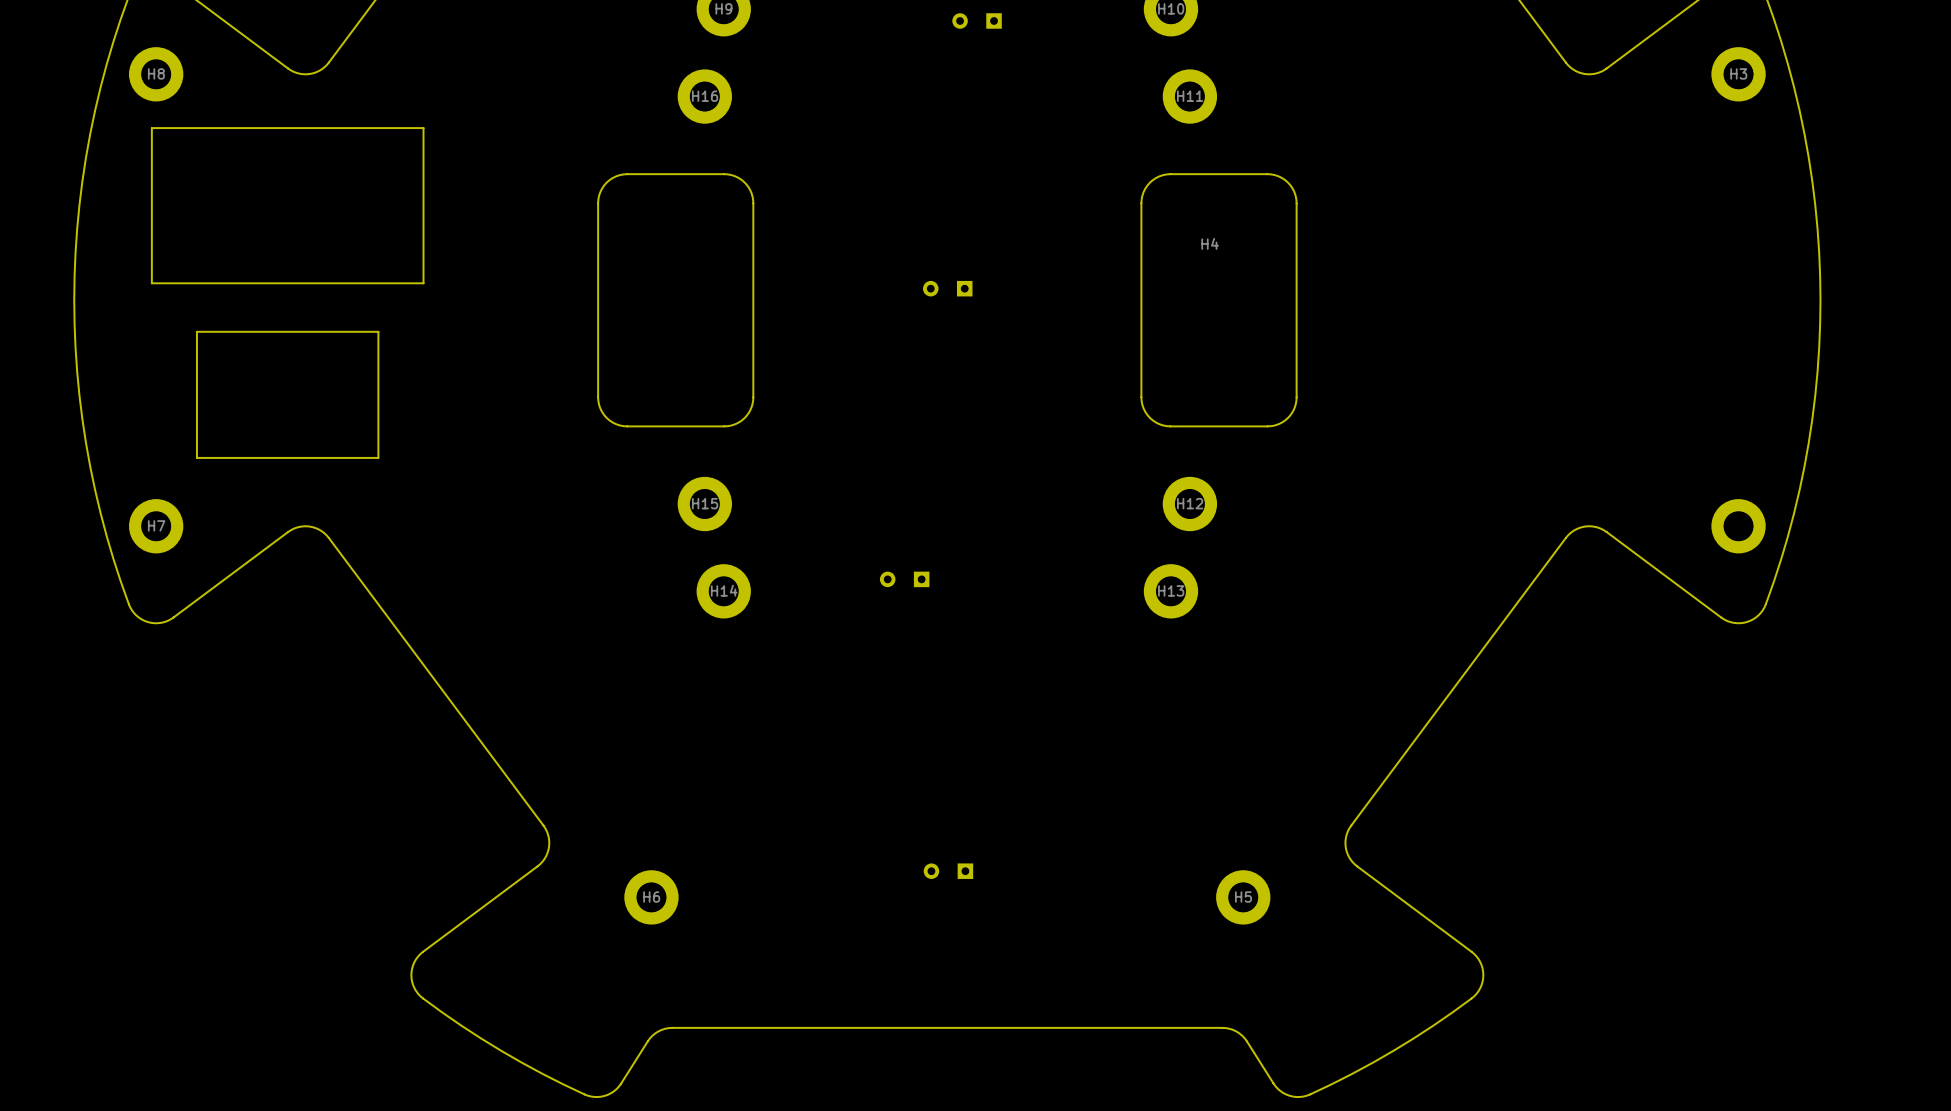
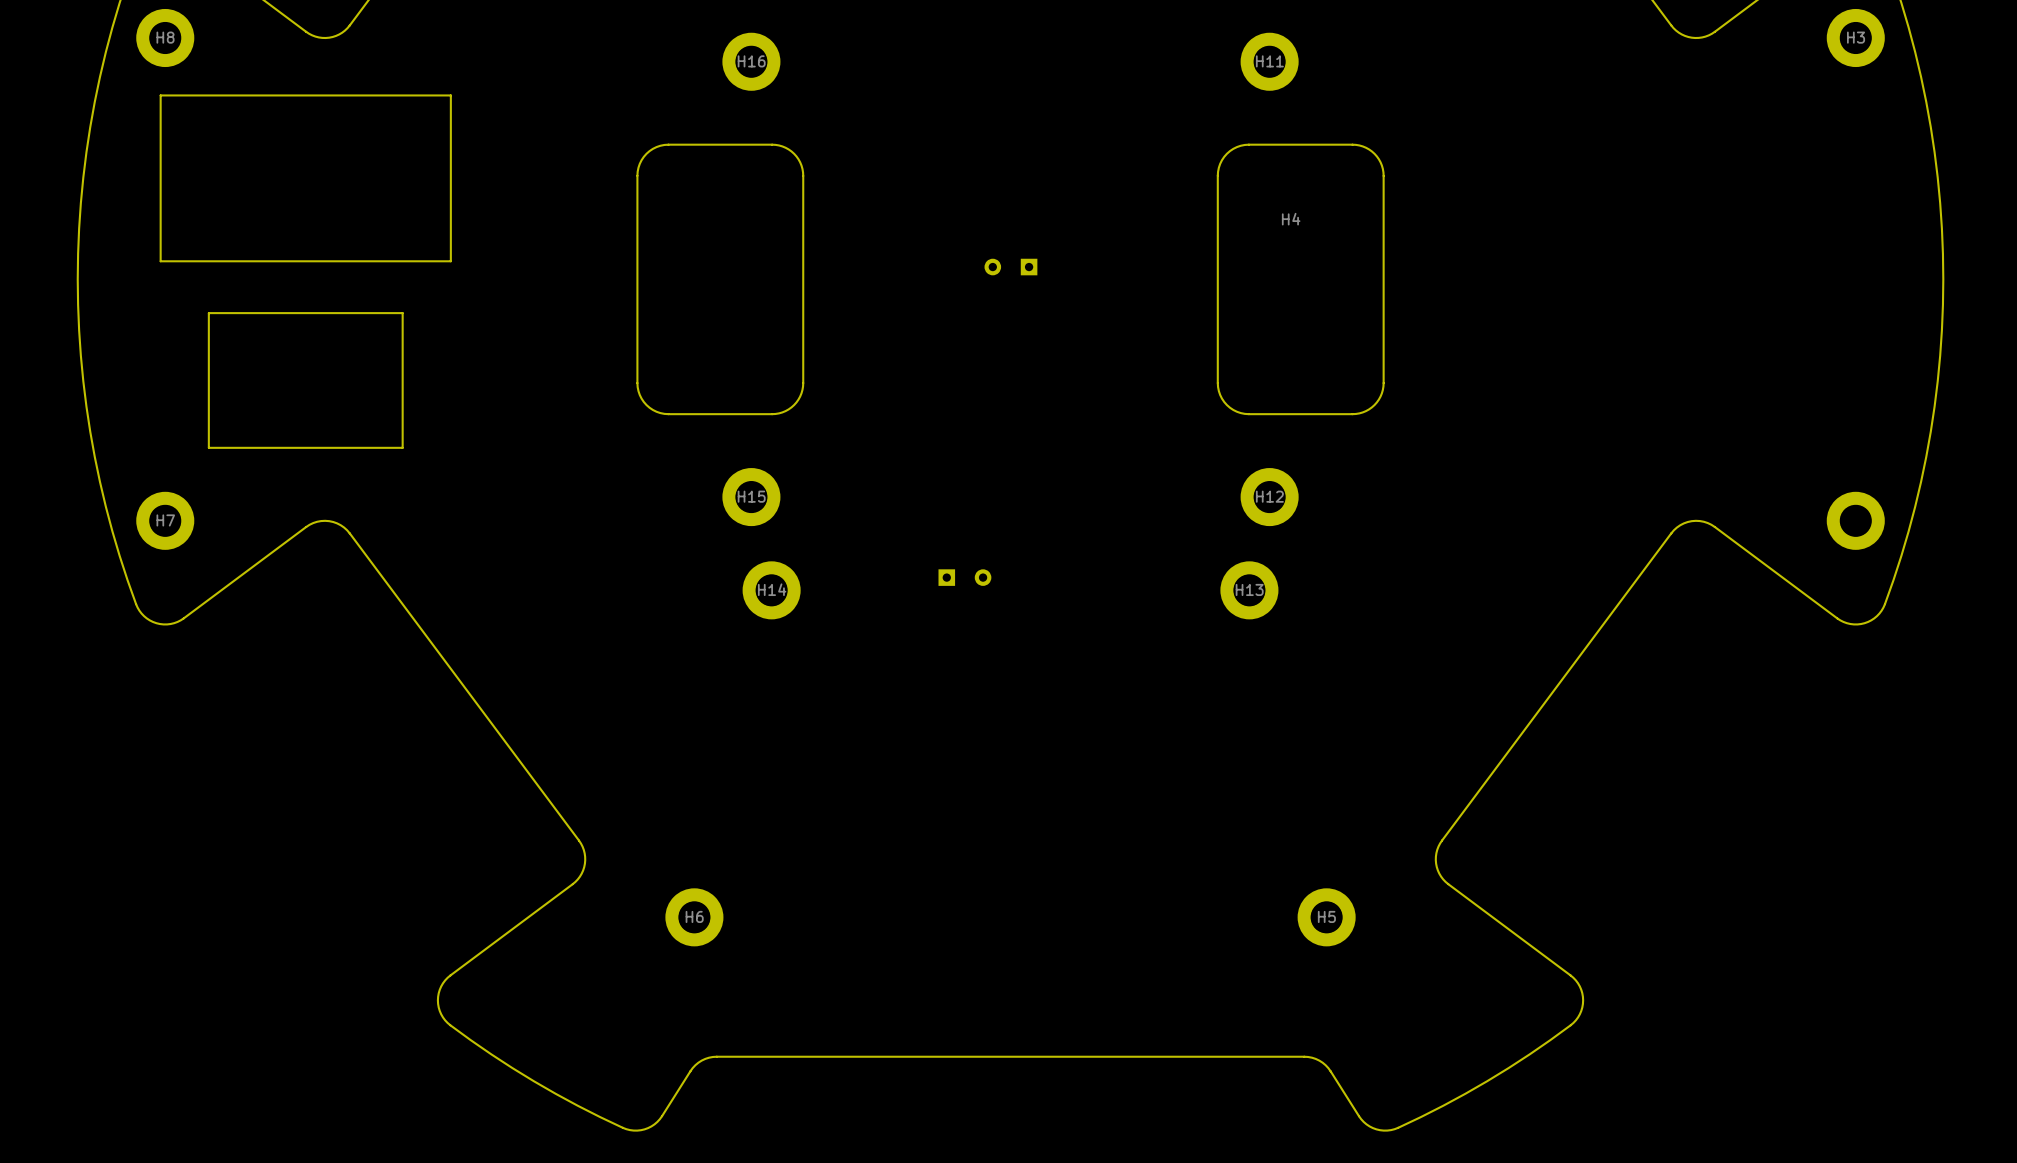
part rotation: 0° (904, 579) -> 180° (964, 577)
part: (948, 871) -> none

